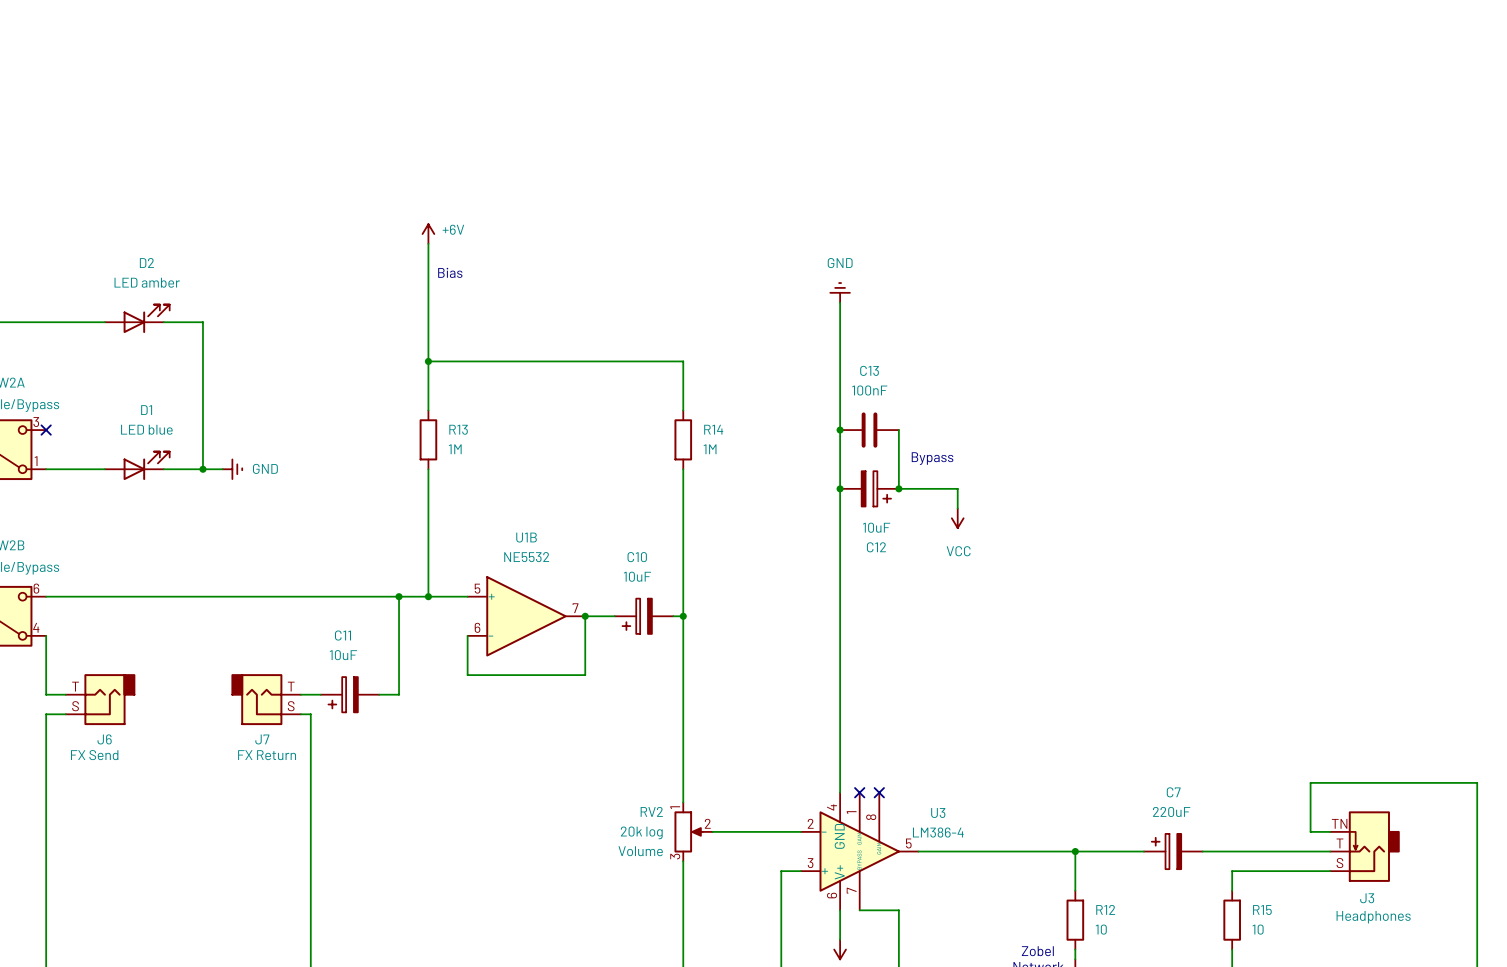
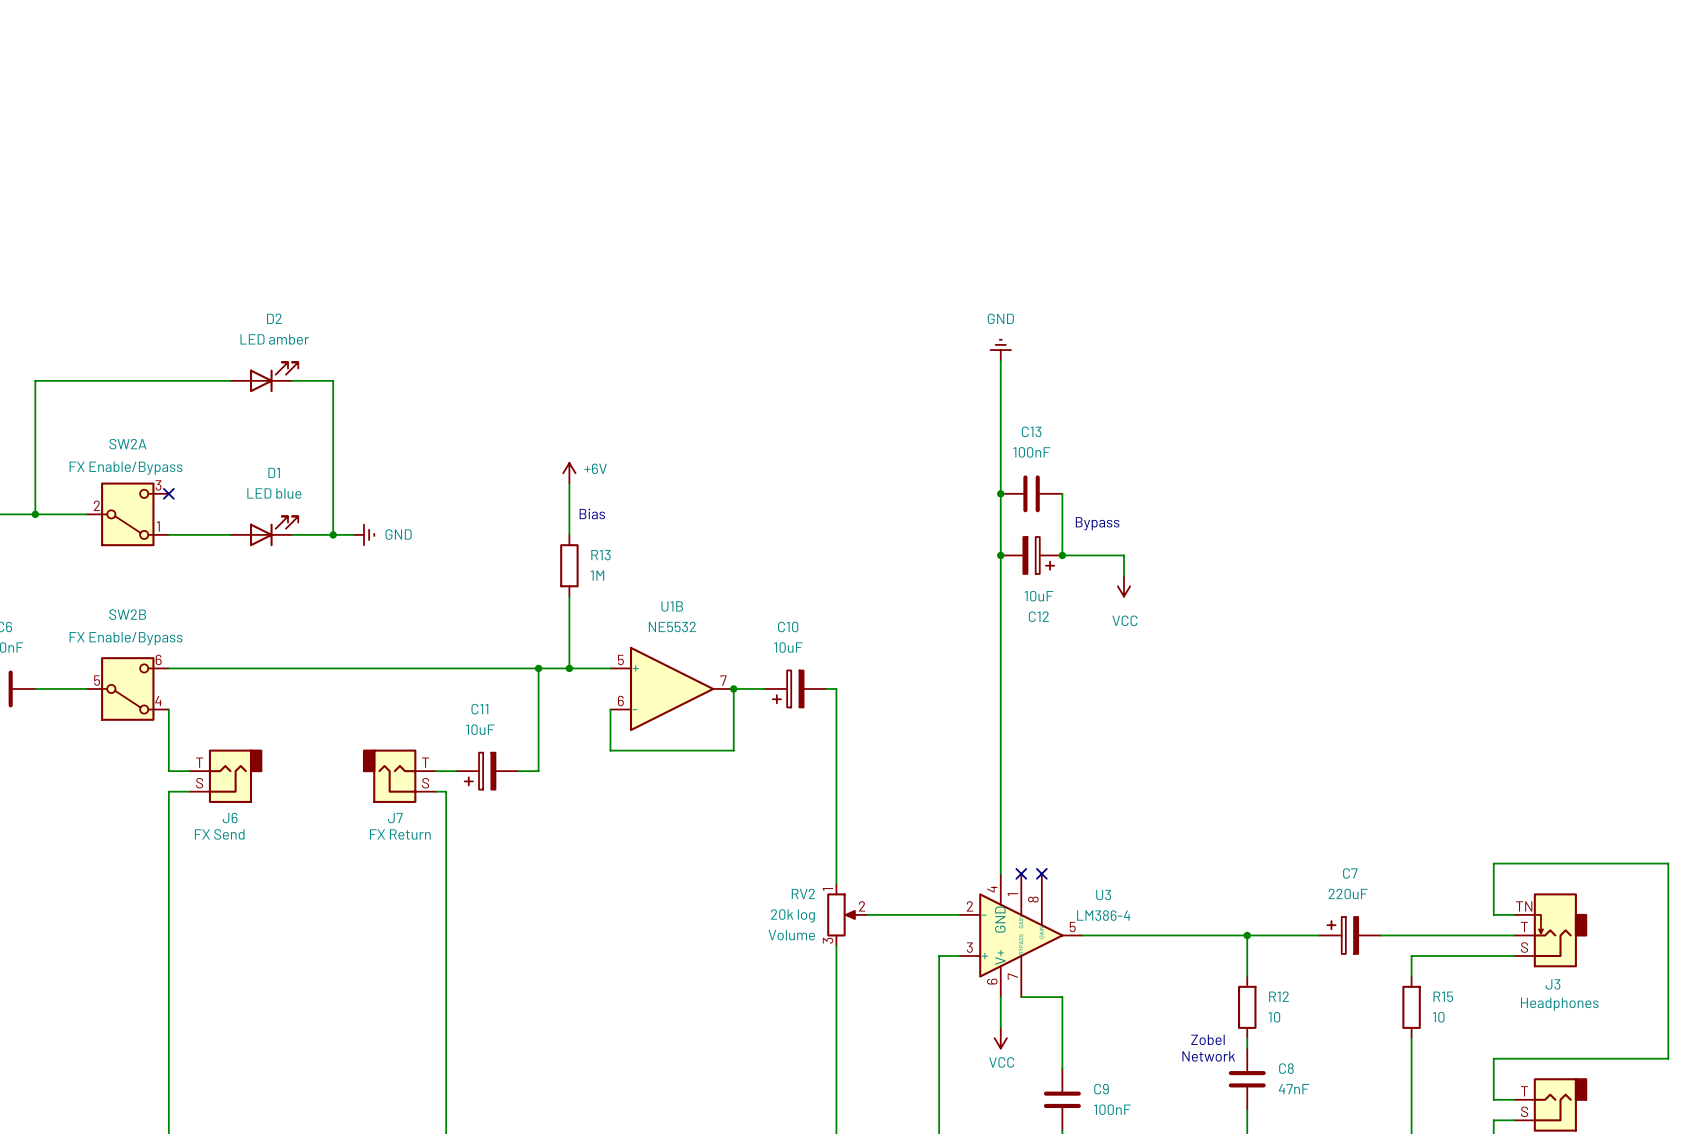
power symbol position: +6V (428, 234) -> +6V (569, 473)
wire: (428, 243) (428, 410) -> none
text position: Bias (450, 272) -> Bias (592, 514)
wire: (428, 361) (683, 361) (683, 410) -> none
junction: (428, 361) -> none
R13 position: (428, 439) -> (569, 565)
R14: 1M (683, 439) -> none
wire: (428, 469) (428, 528) -> (569, 534) (569, 483)
wire: (683, 469) (683, 616) -> none
junction: (683, 616) -> none

